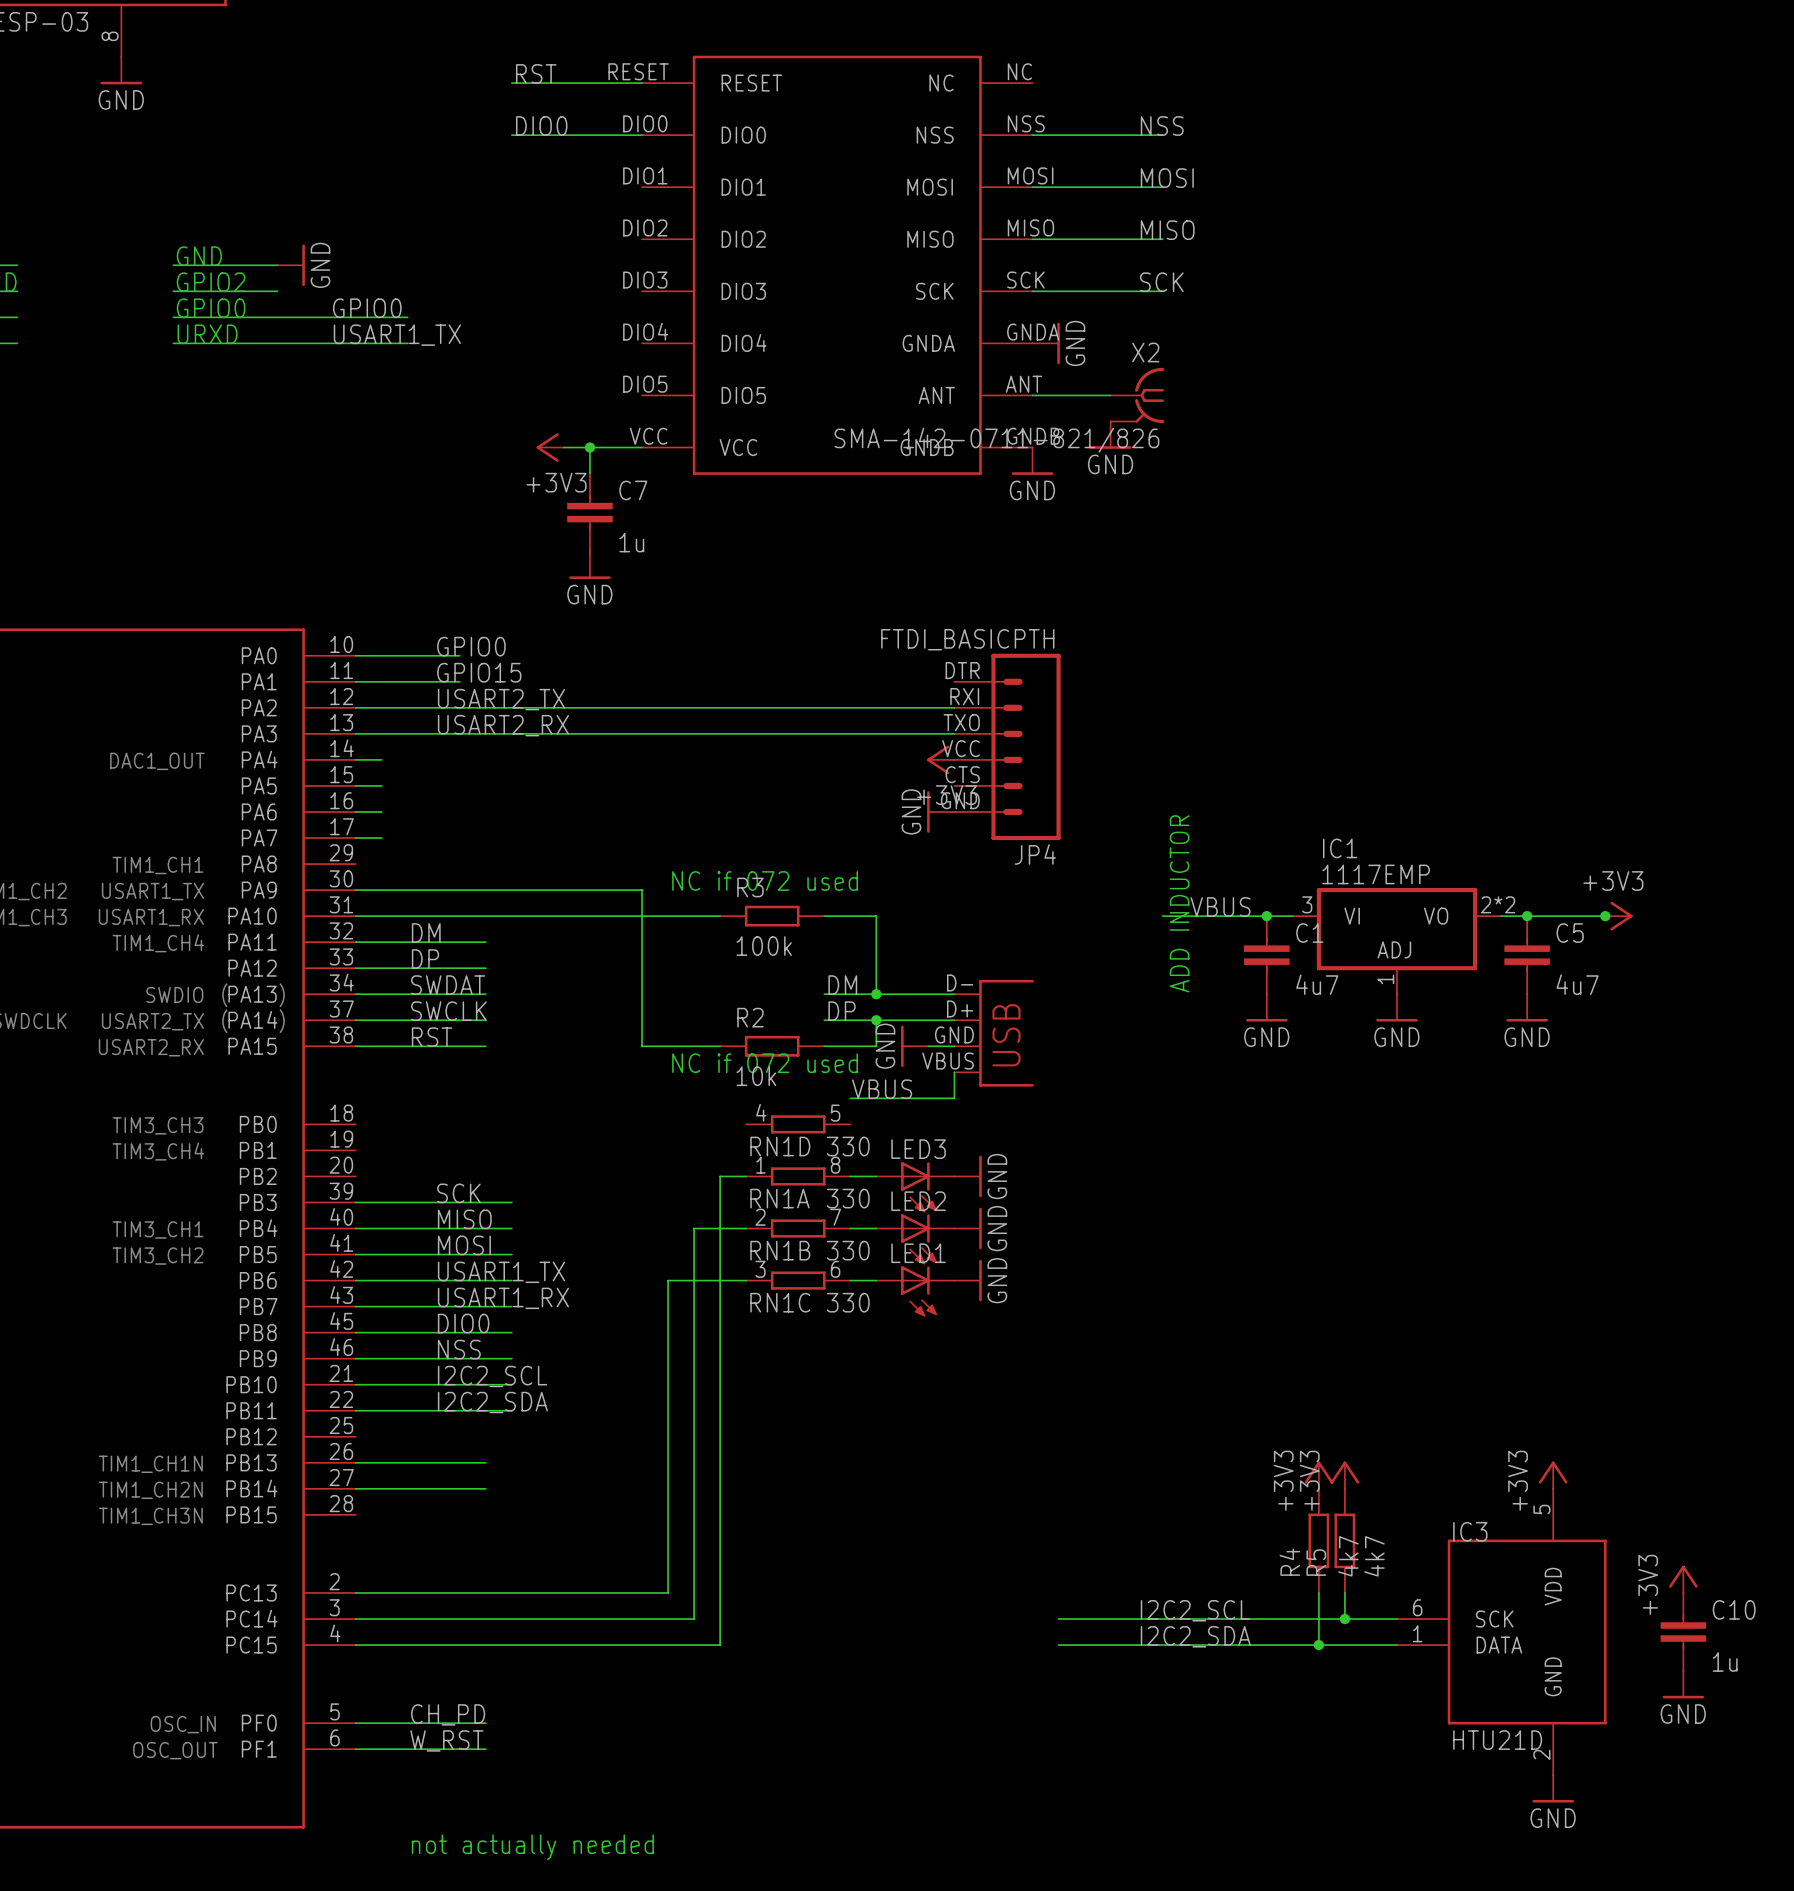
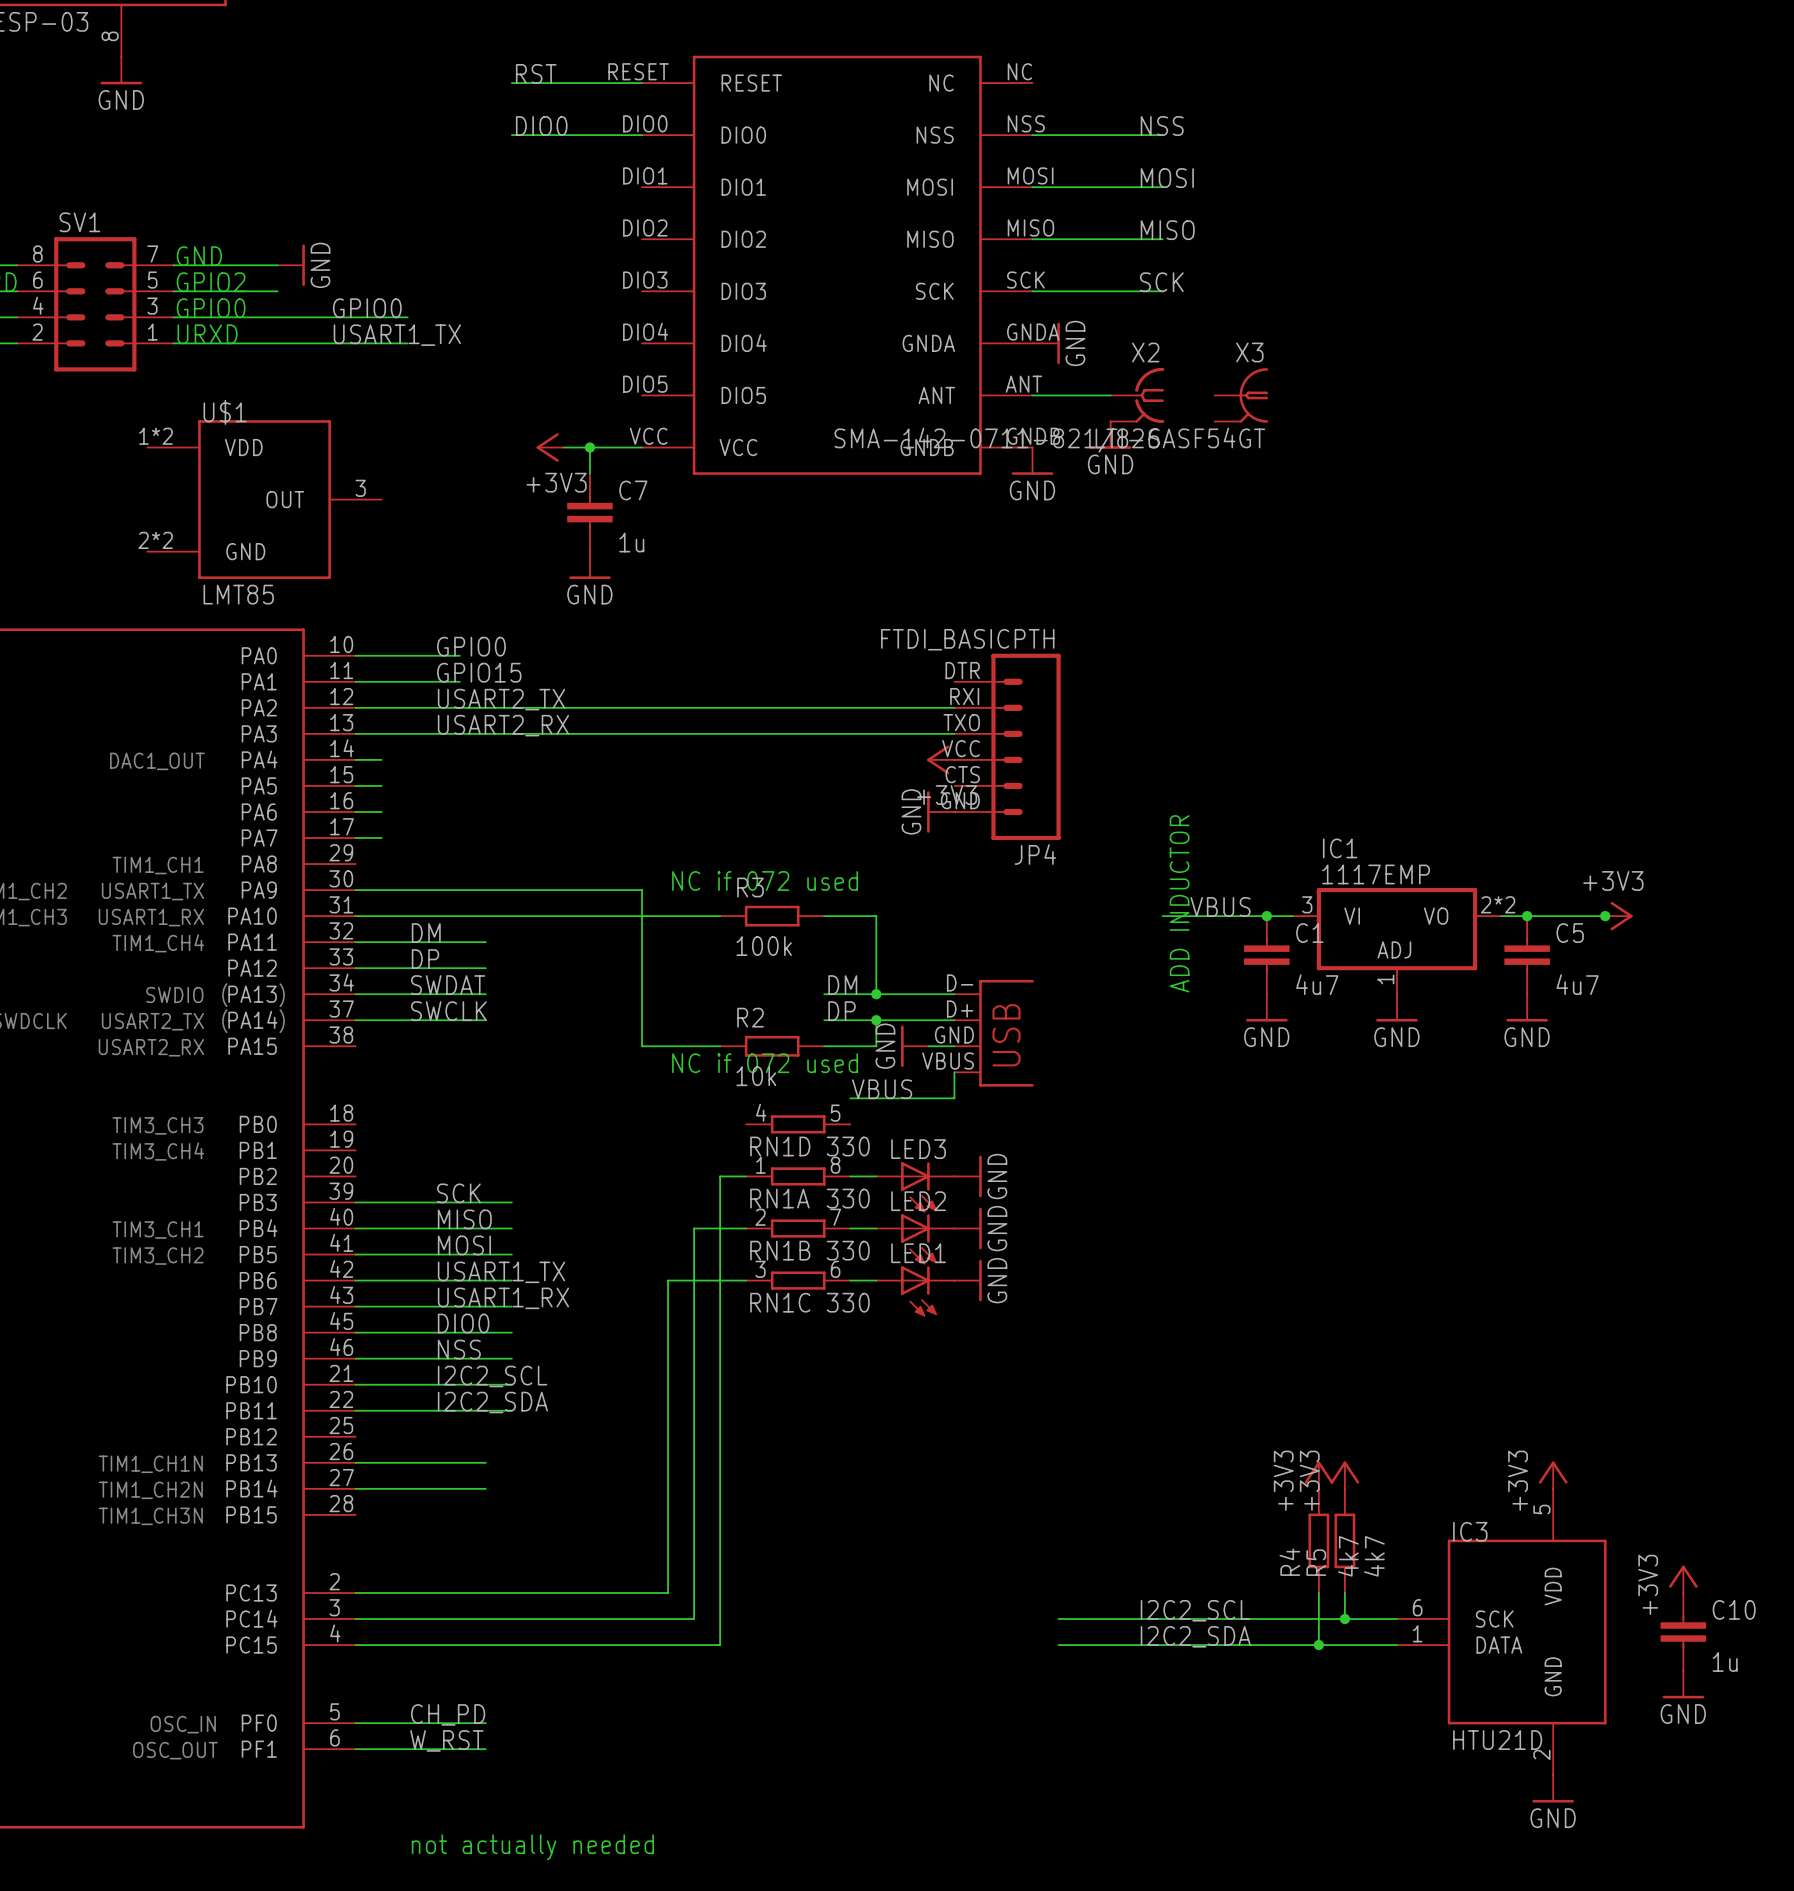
SV1: none -> (95, 304)
X3: none -> LTI-SASF54GT (1241, 395)
U$1: none -> LMT85 (264, 499)
label: RST (432, 1037) -> none
wire: (355, 1046) (485, 1046) -> none

